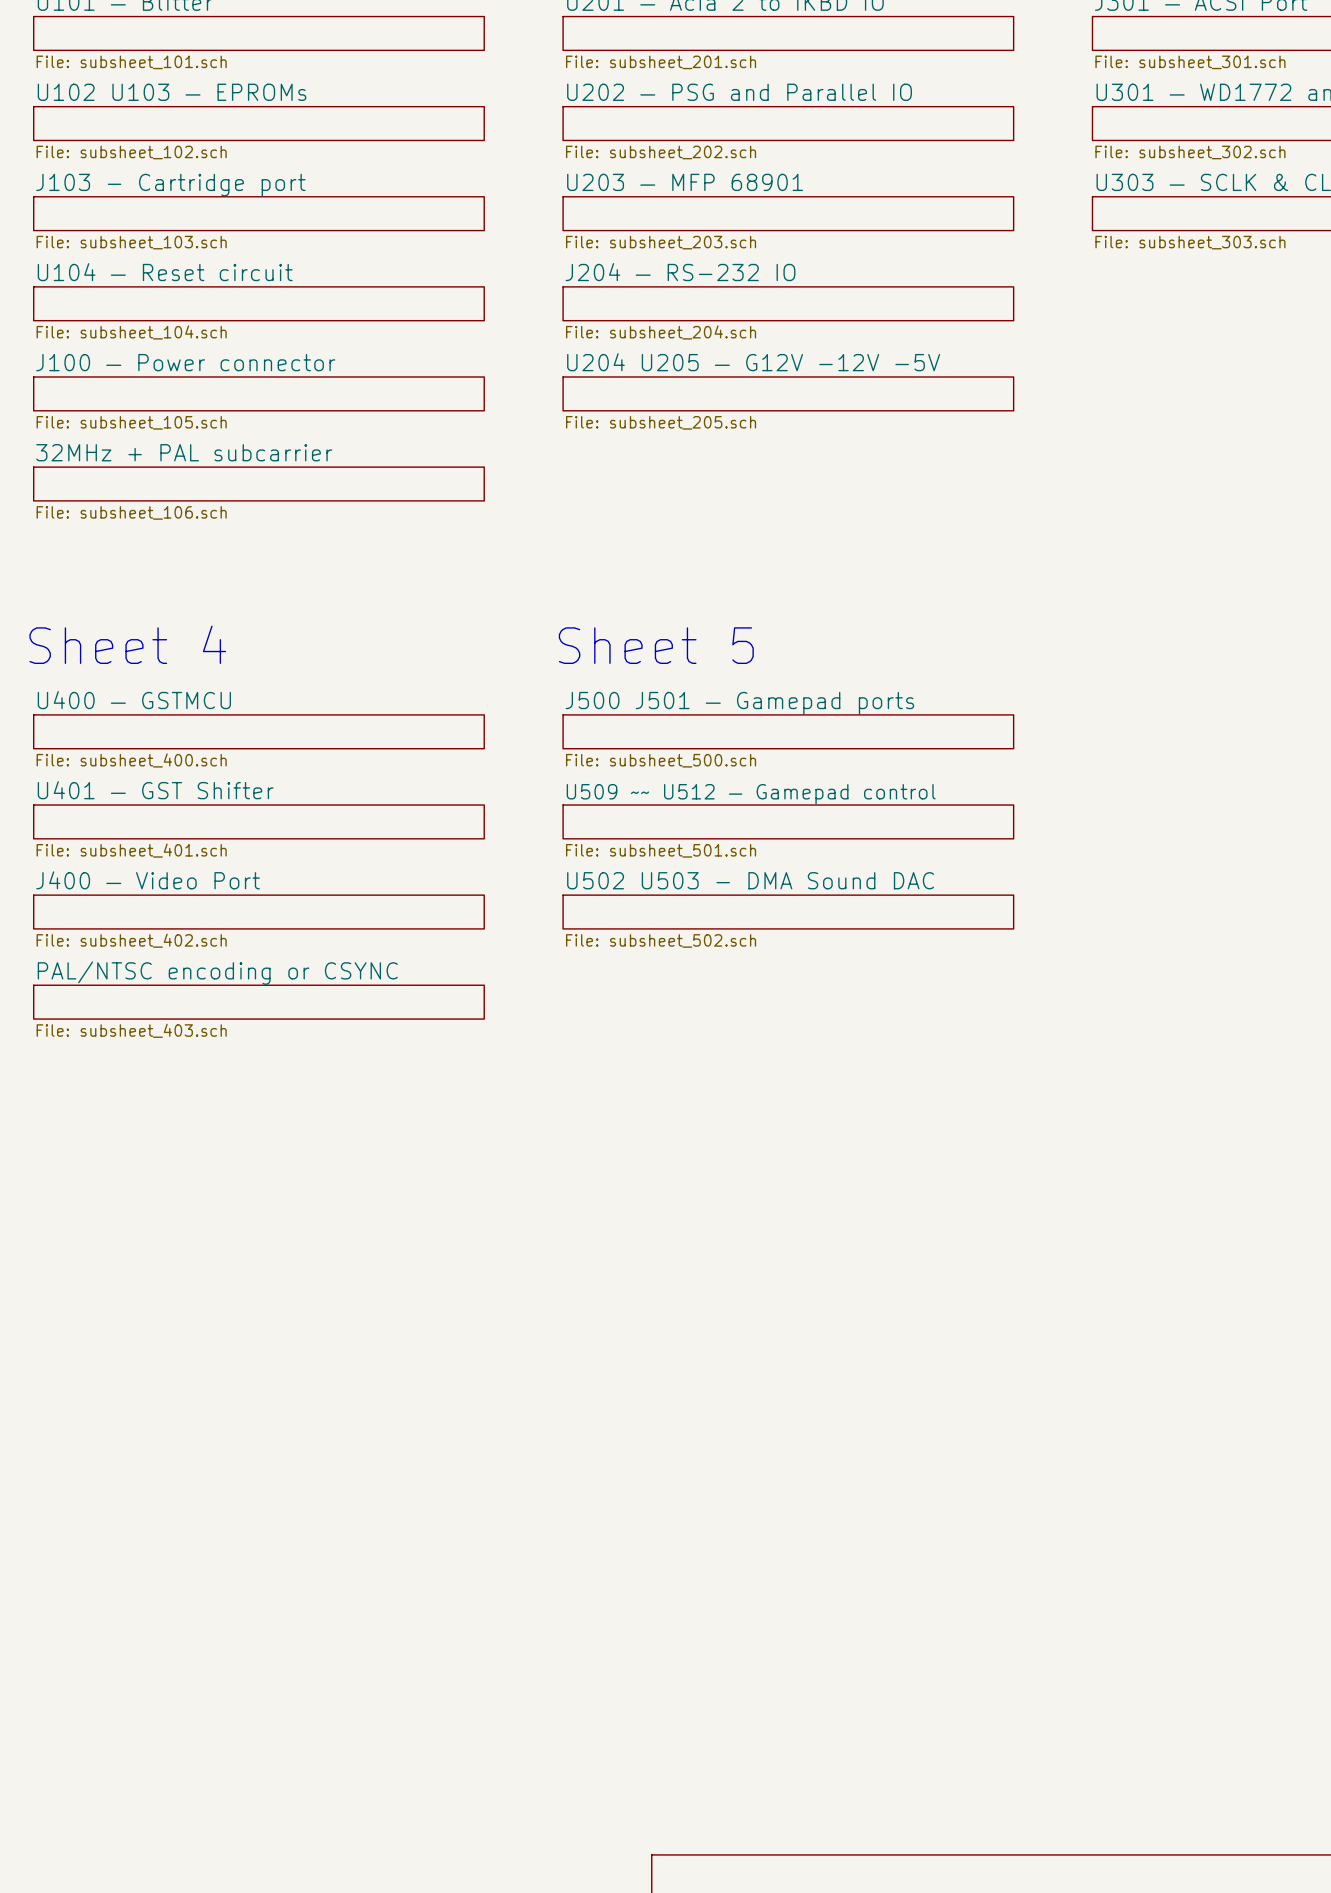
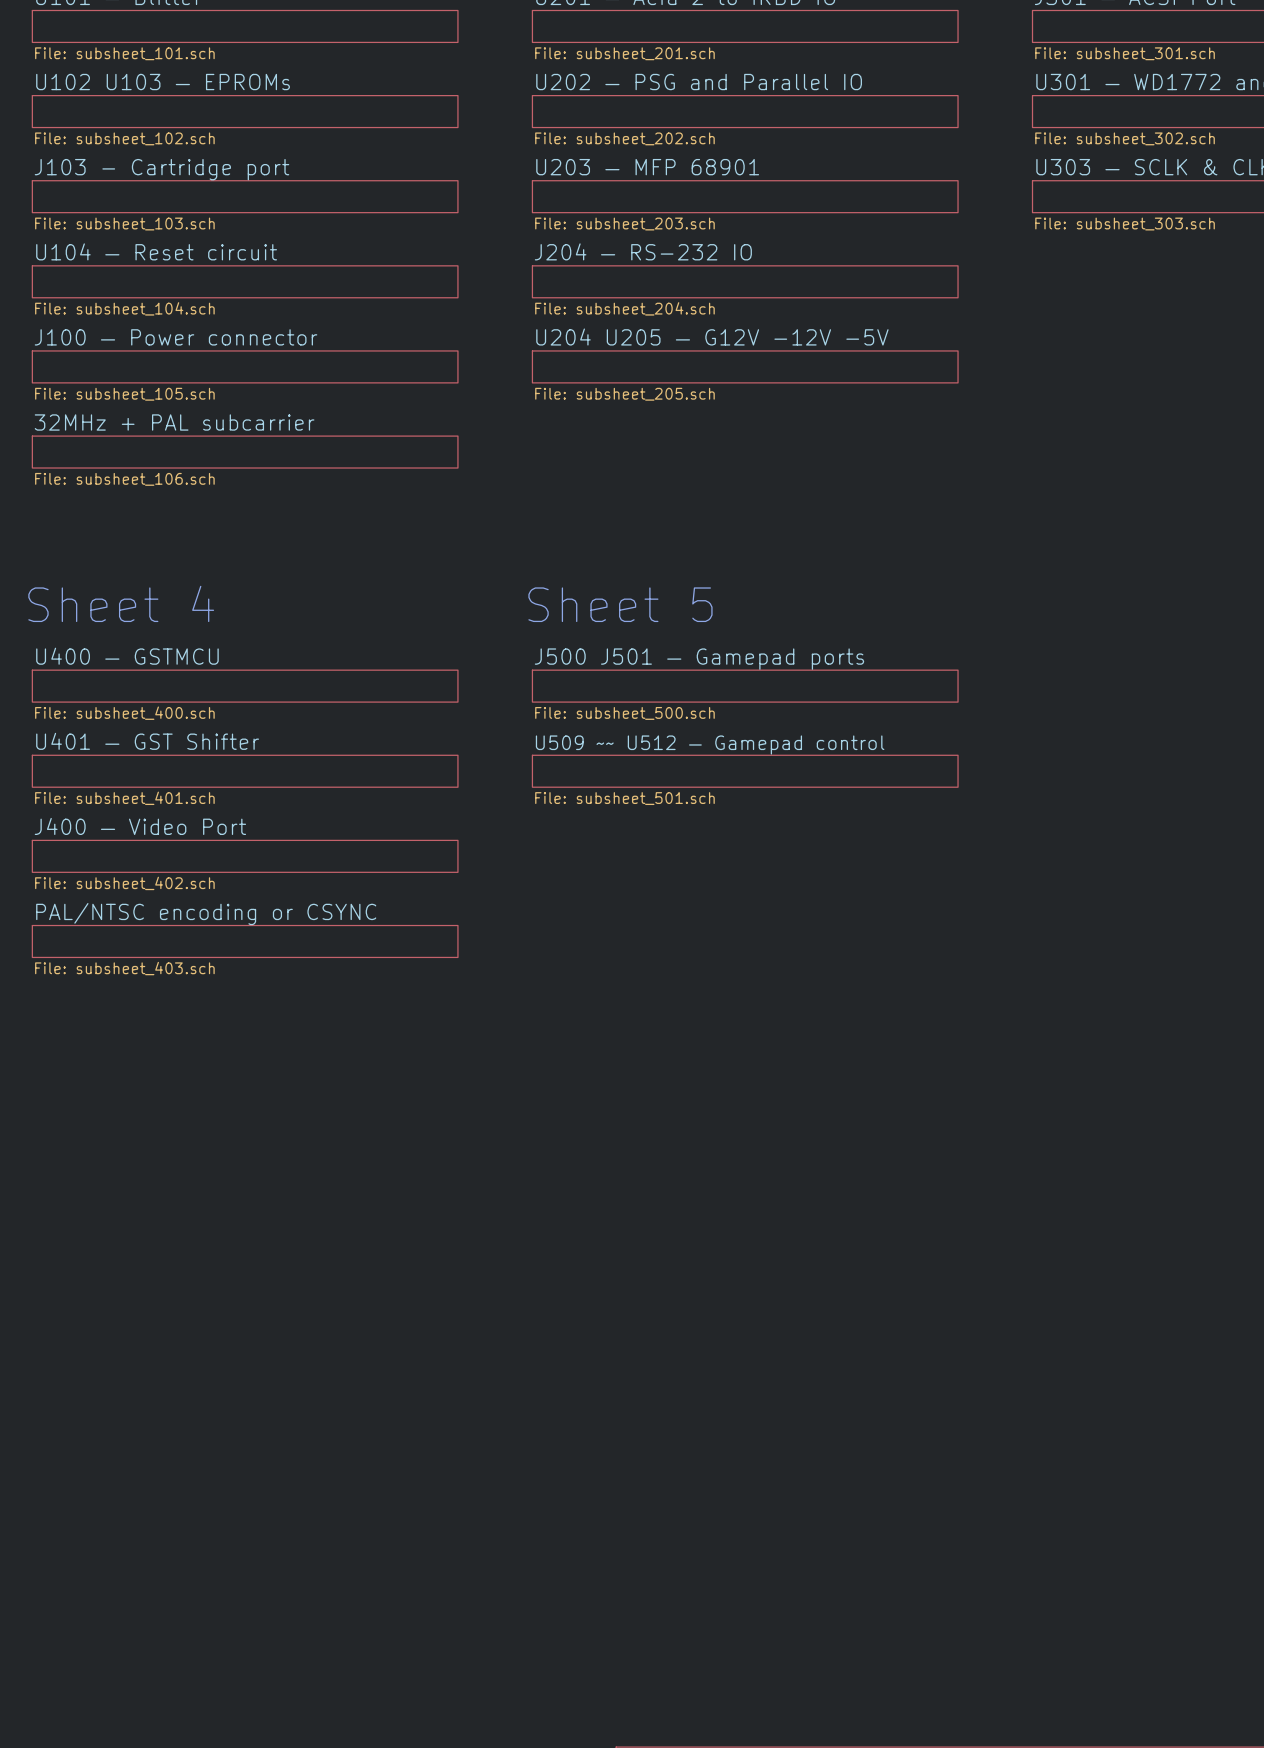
sheet U502 U503 - DMA Sound DAC: File: subsheet_502.sch (788, 912) -> none

